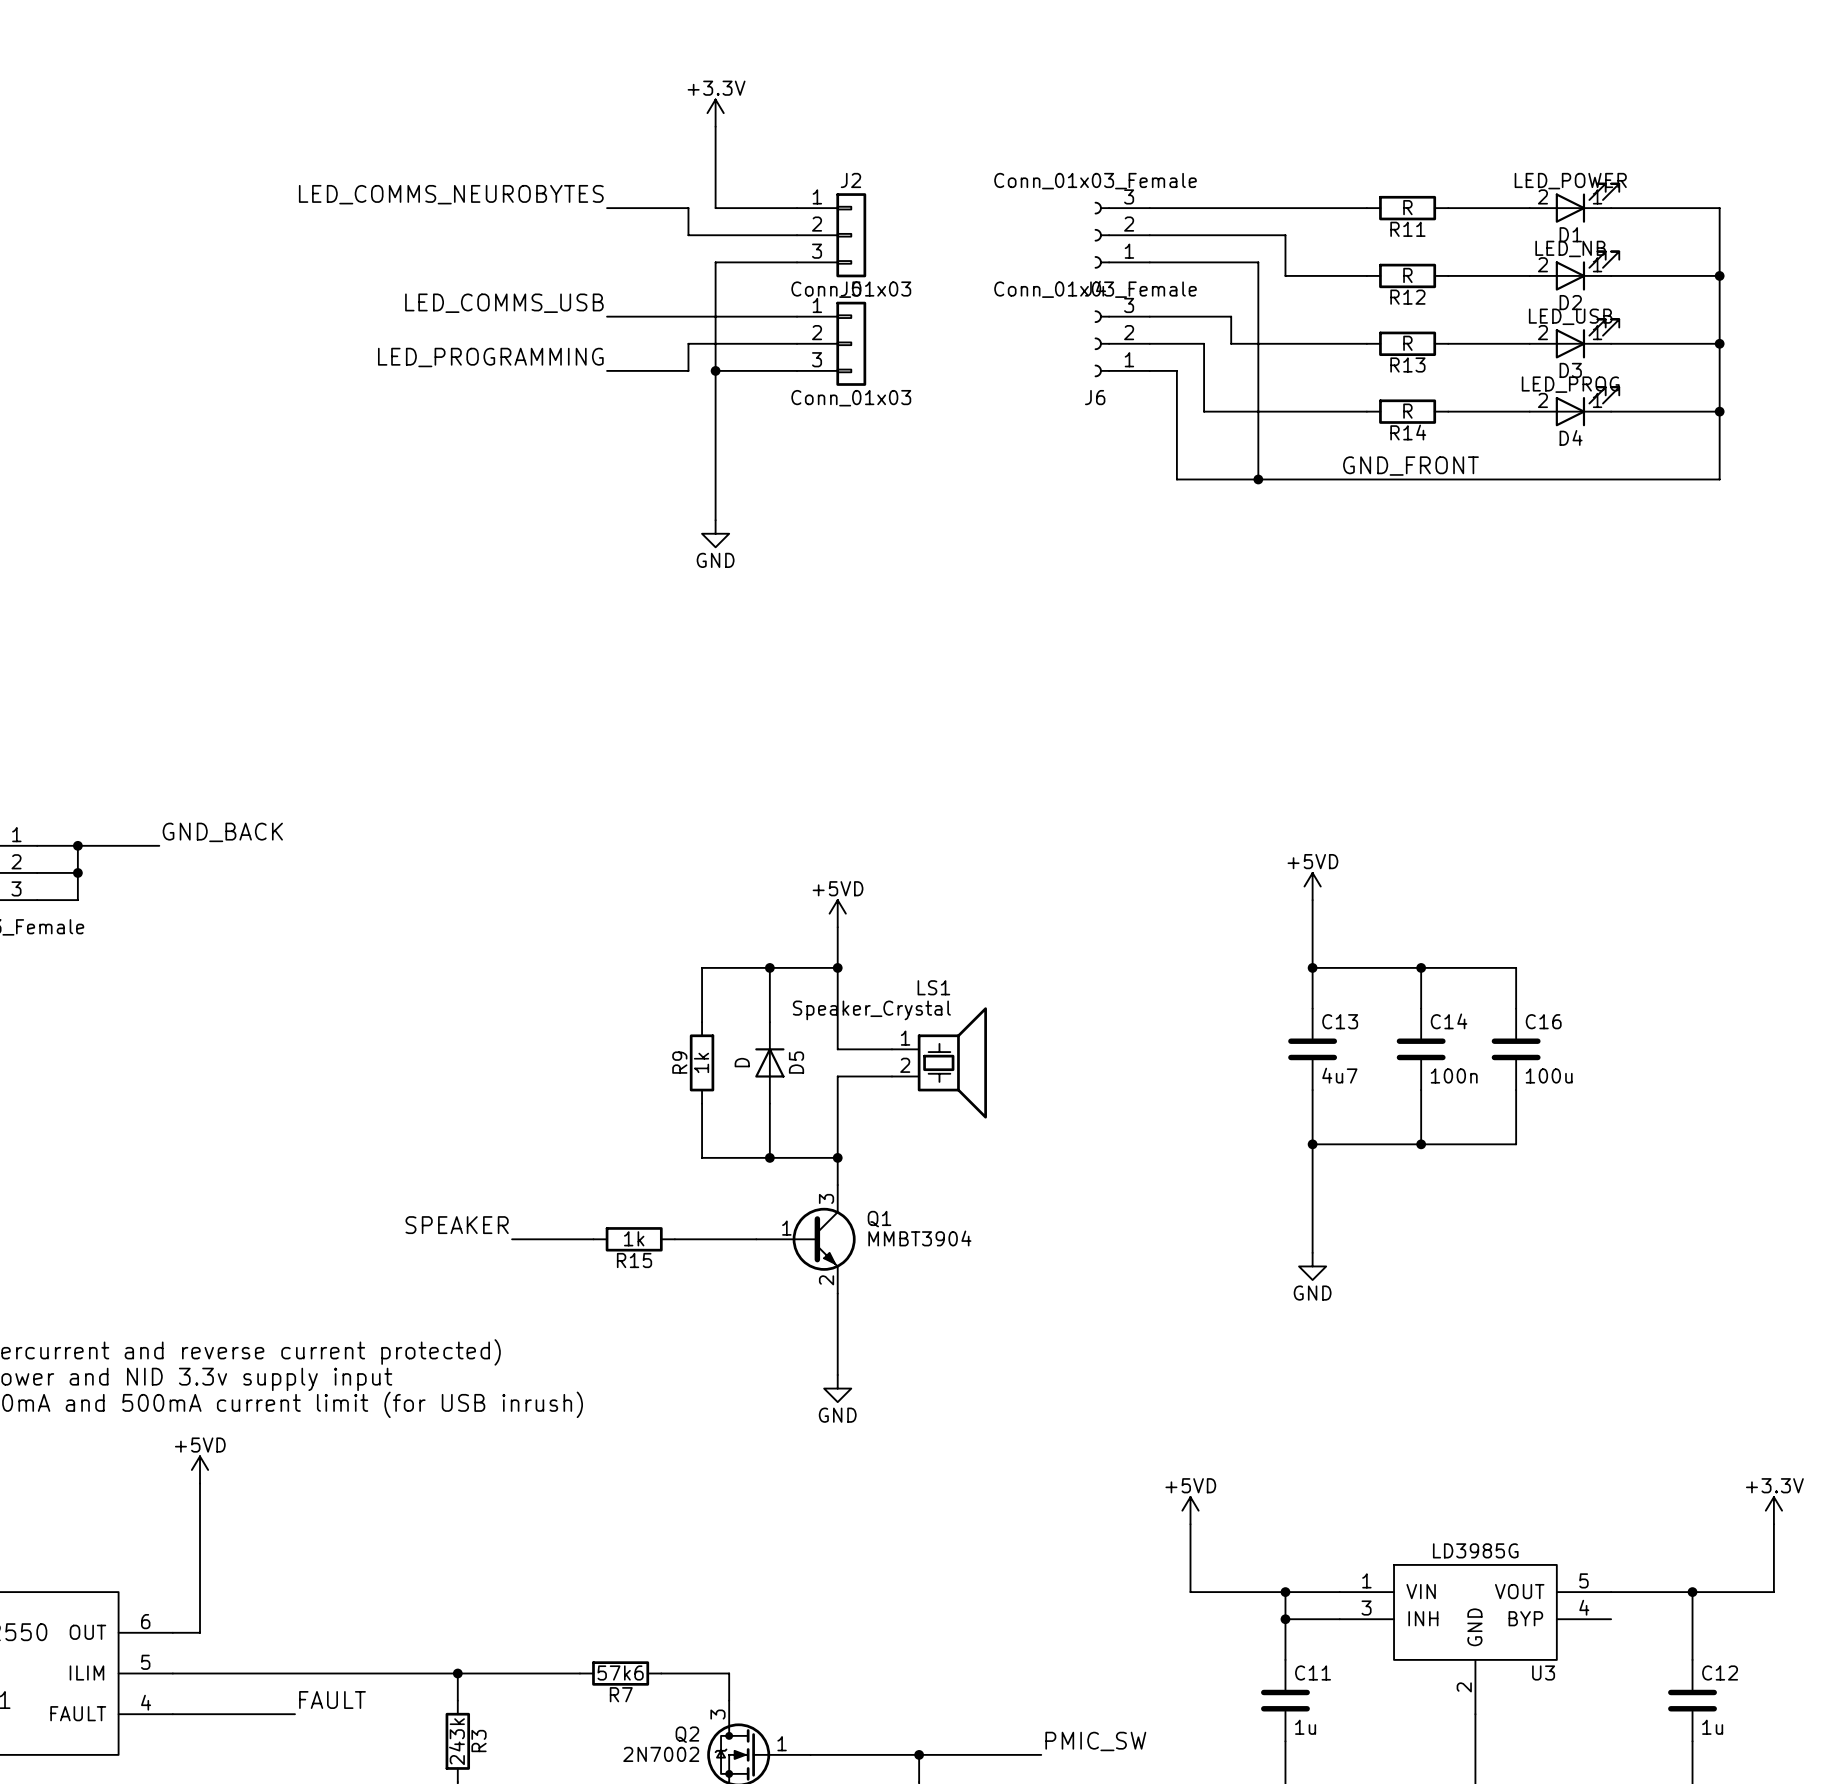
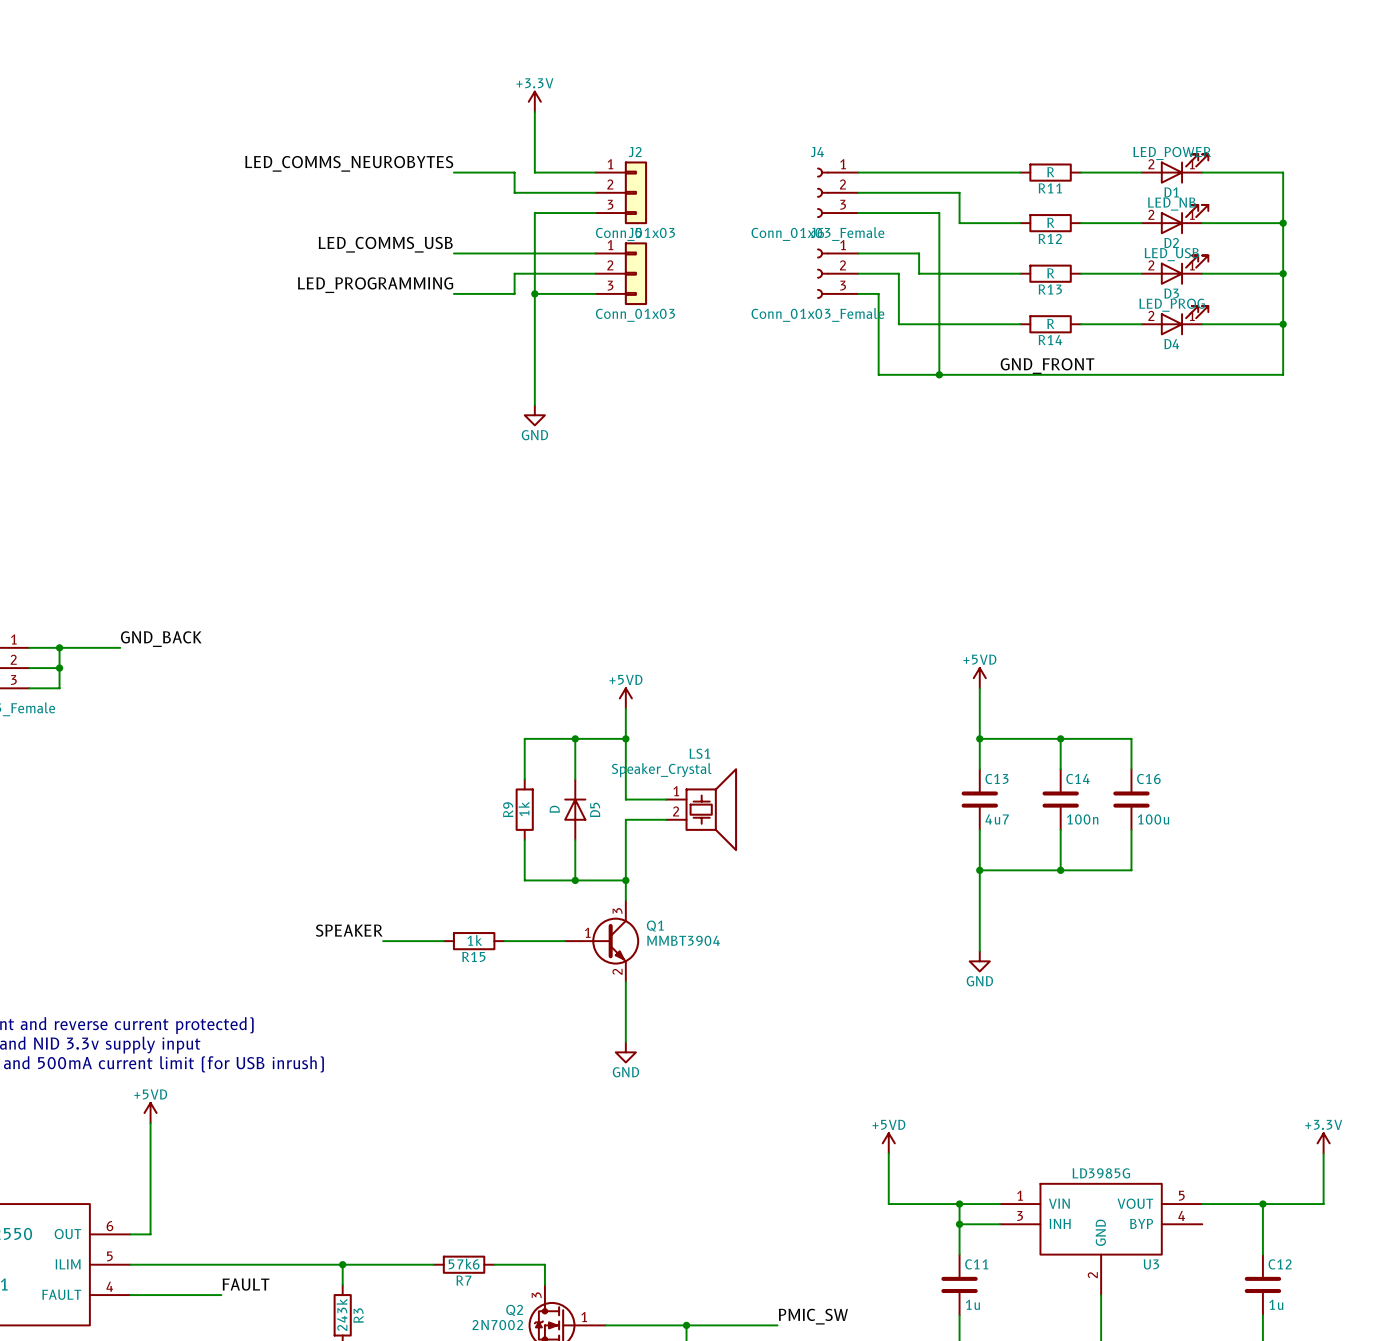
J4 flip: as is (1102, 235) -> up-down (823, 192)
J6 flip: as is (1102, 343) -> up-down (823, 273)

